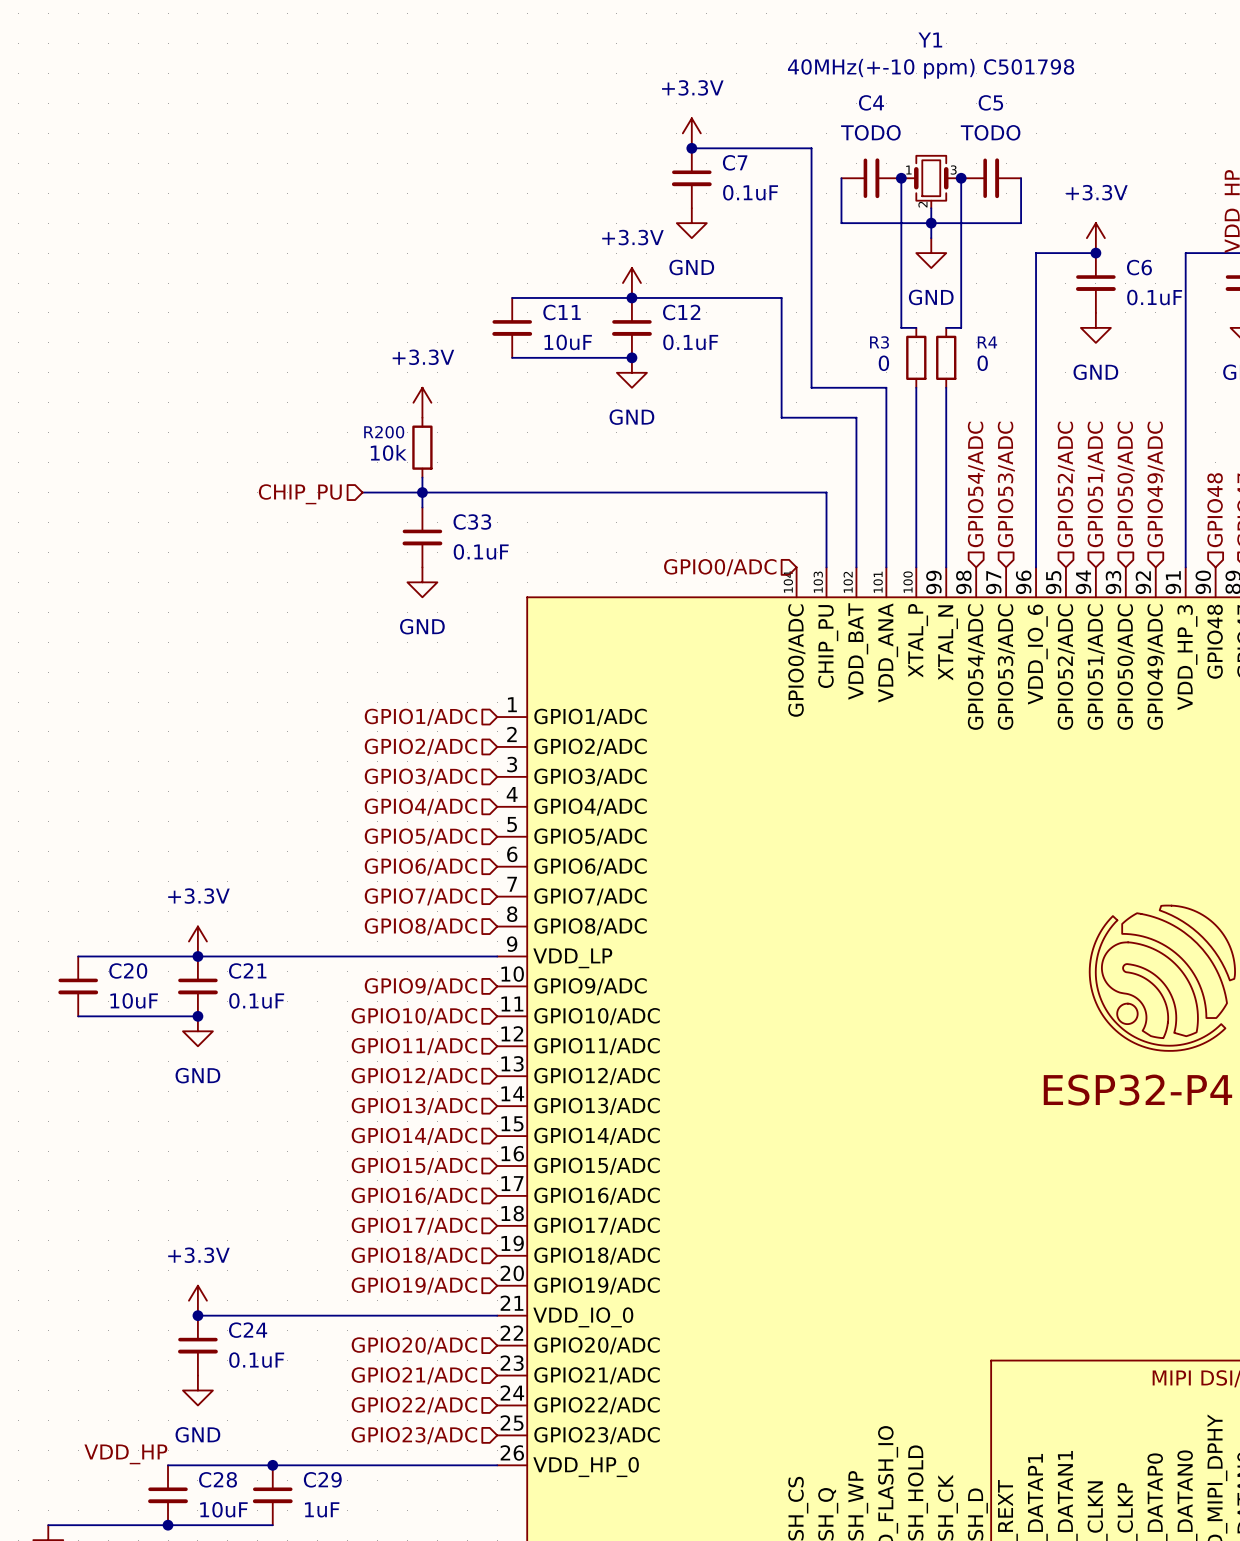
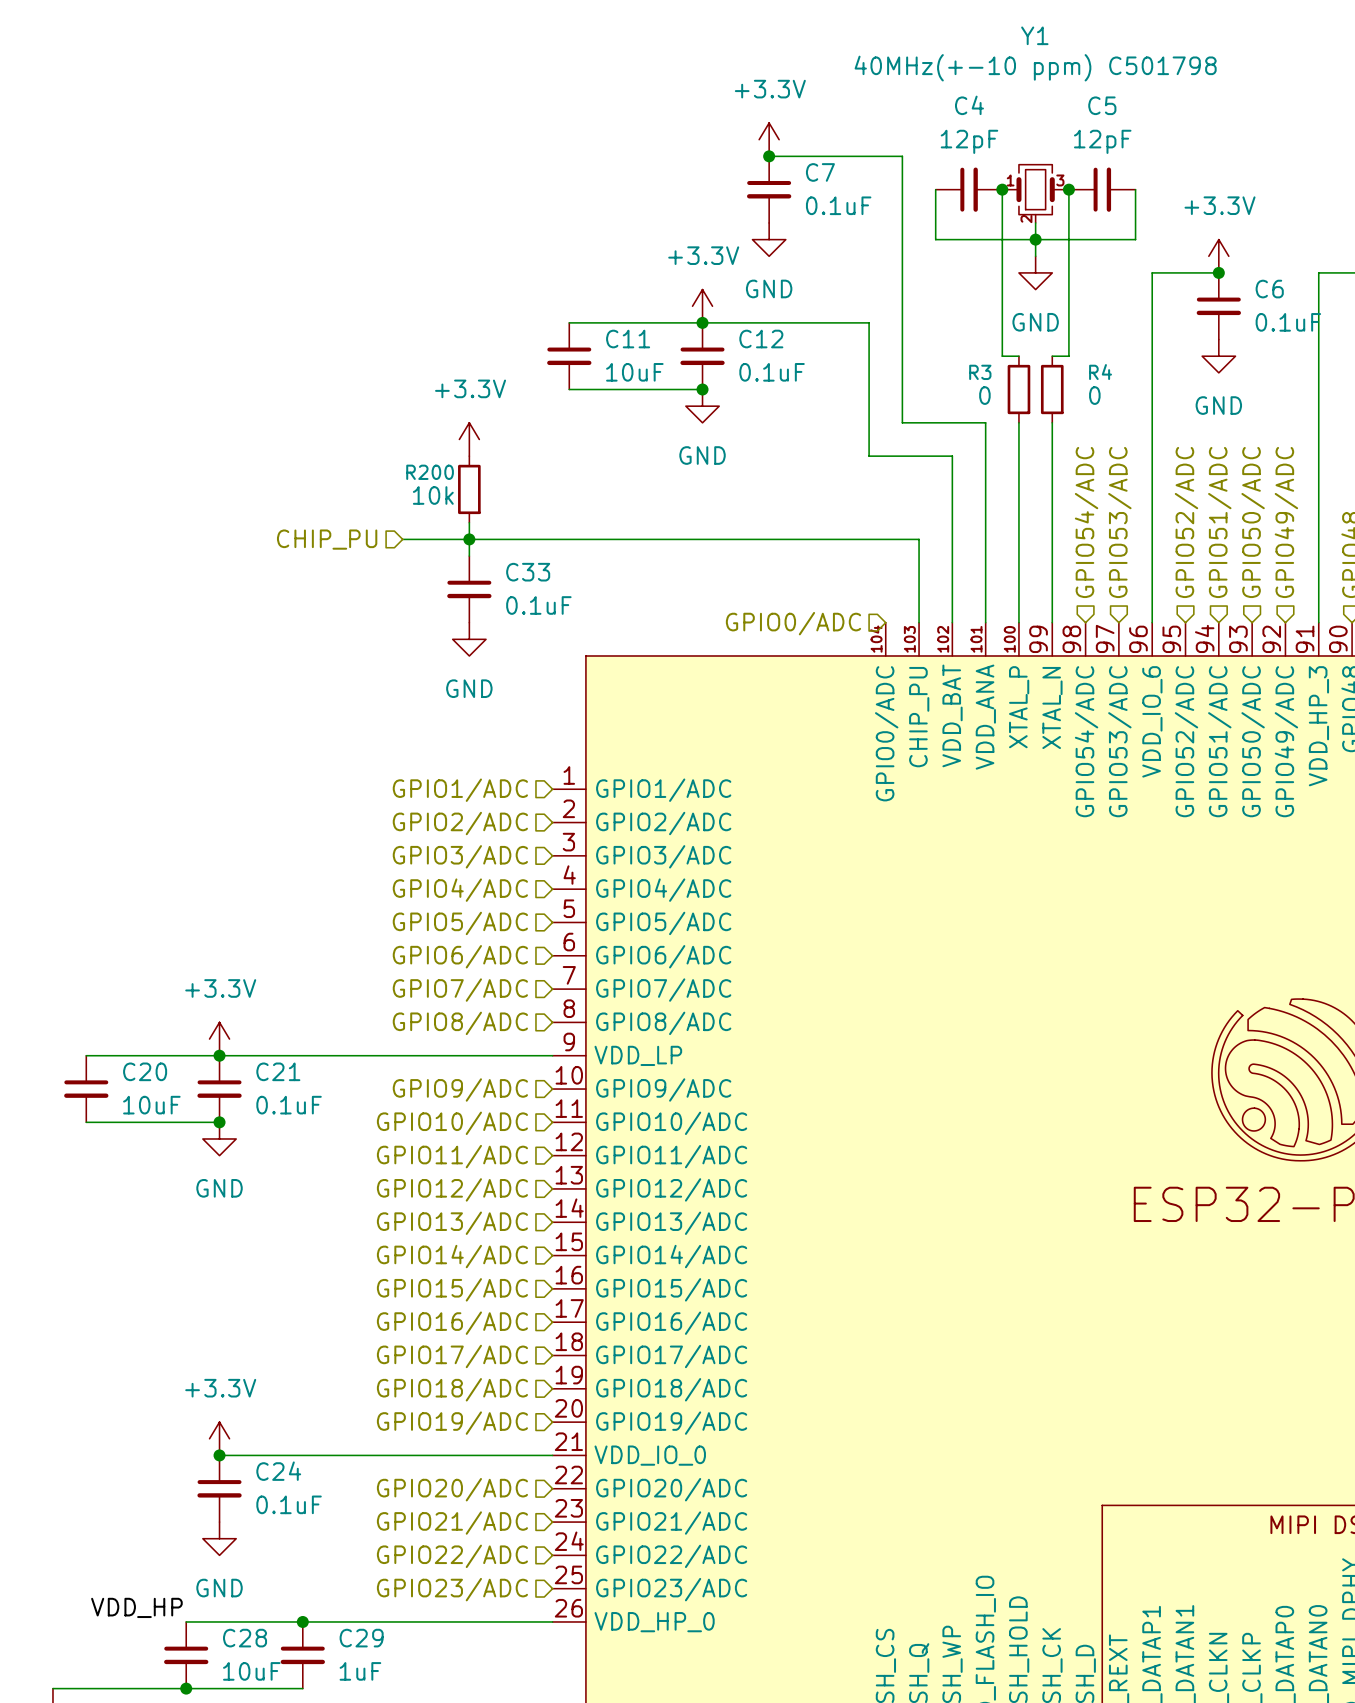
C4 value: TODO (870, 132) -> 12pF (969, 141)
C5 value: TODO (990, 132) -> 12pF (1102, 141)

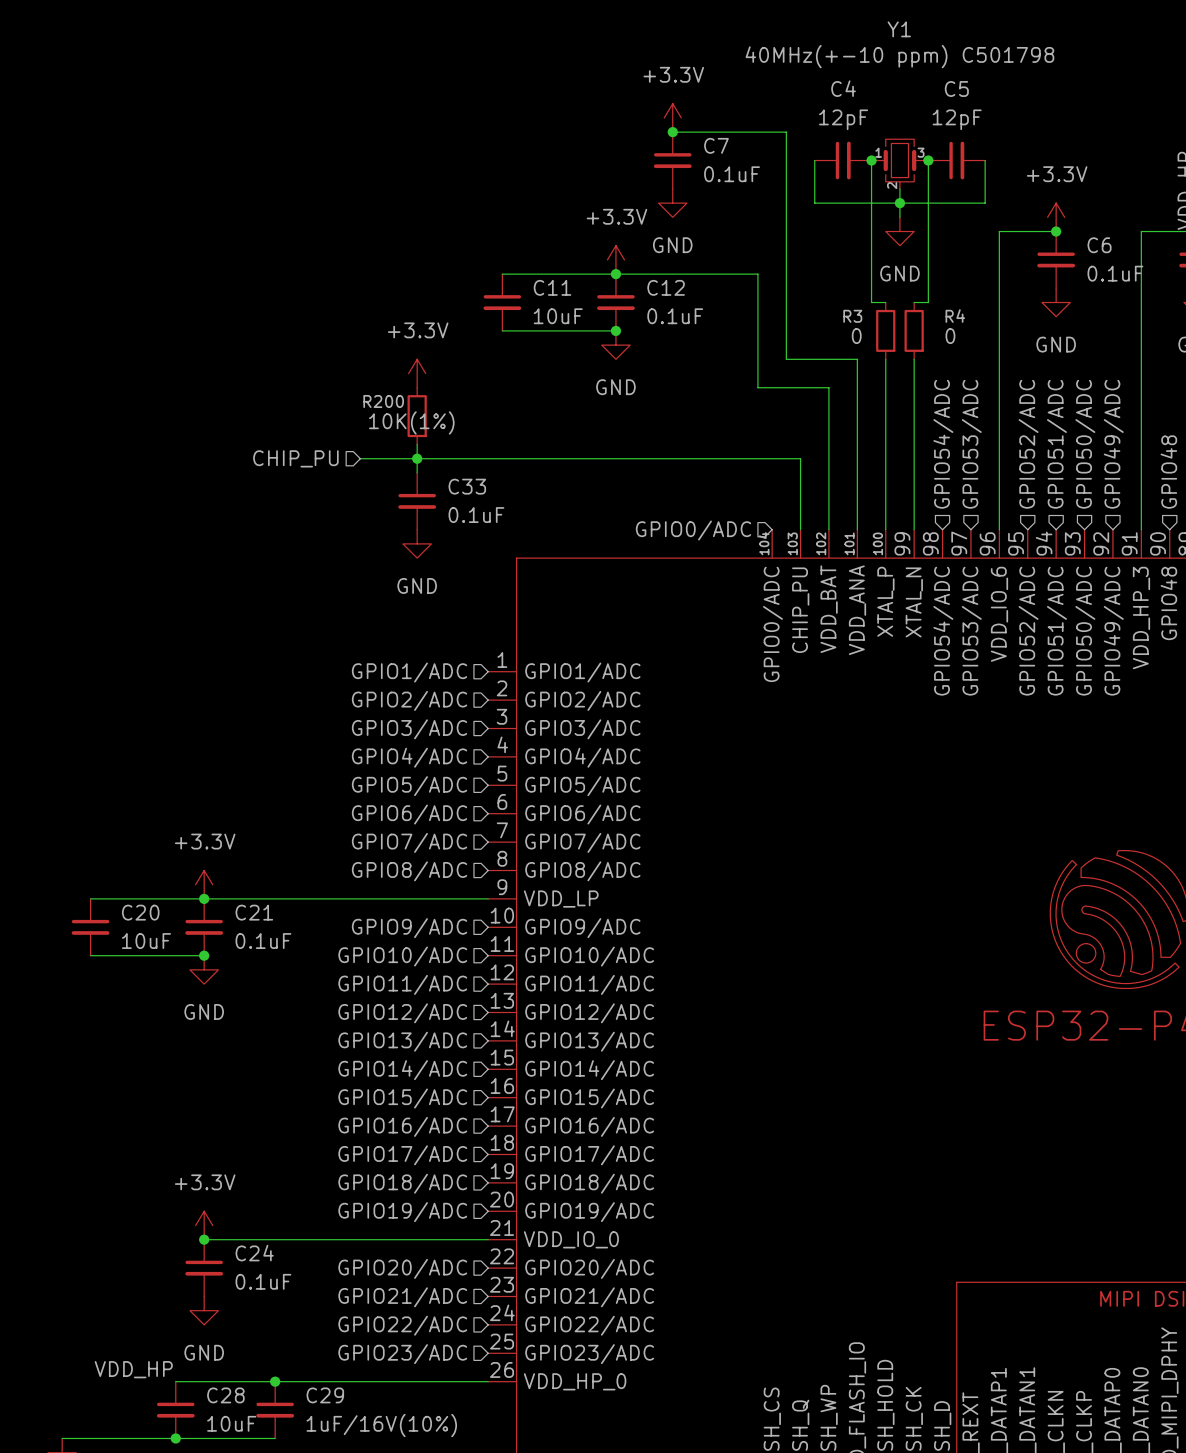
R200 value: 10k (433, 495) -> 10K(1%) (411, 422)
C29 value: 1uF (360, 1671) -> 1uF/16V(10%) (381, 1425)

